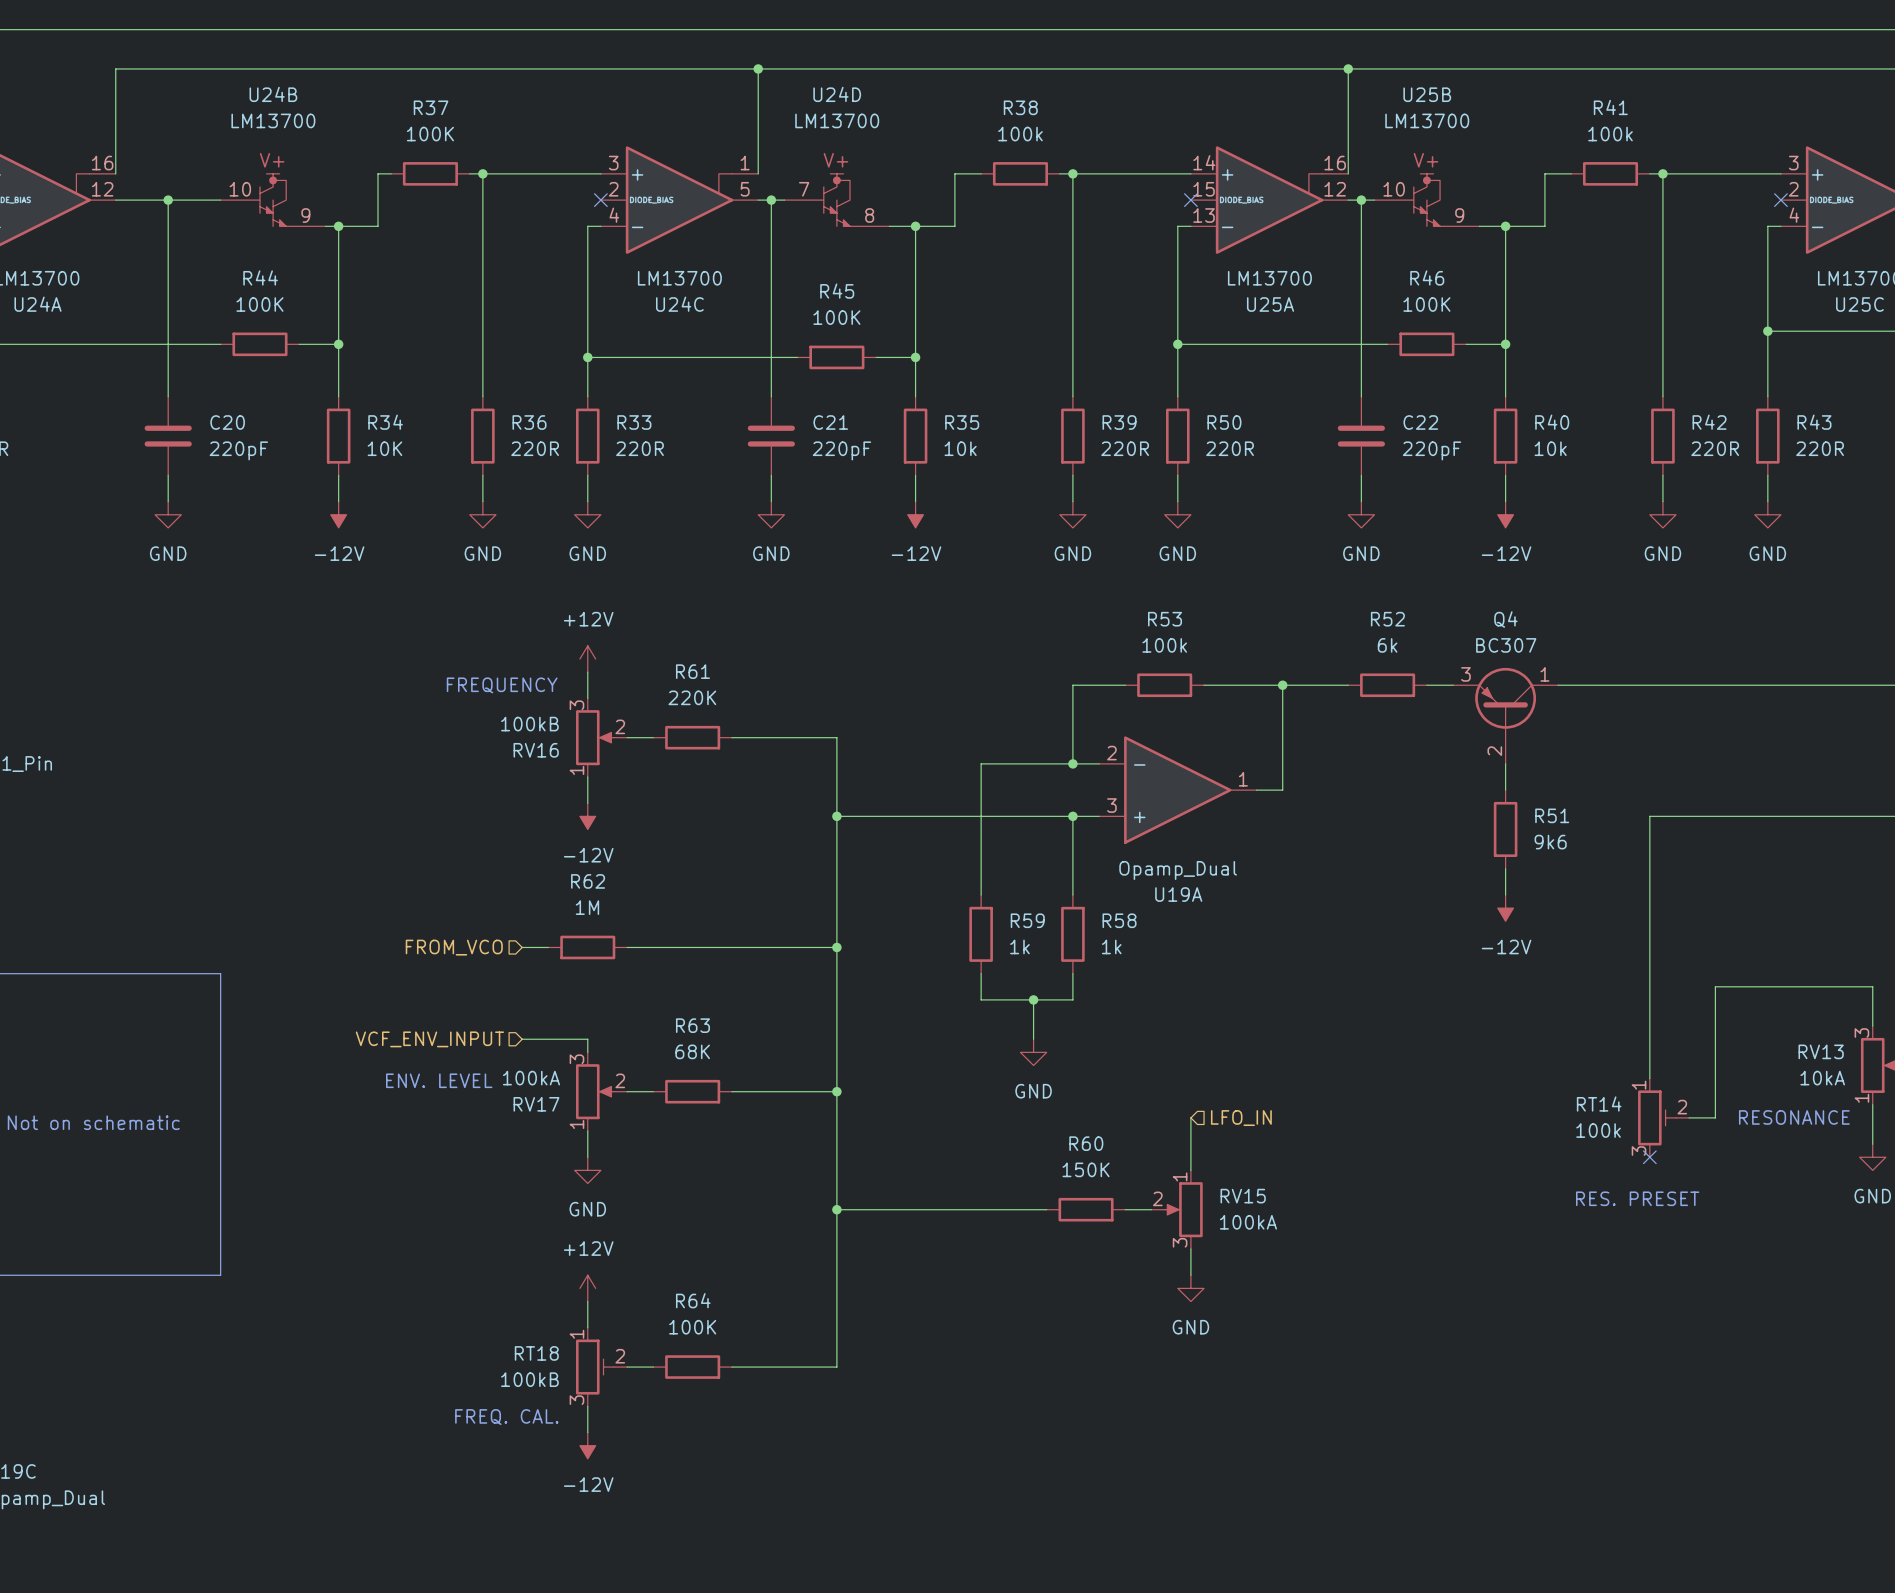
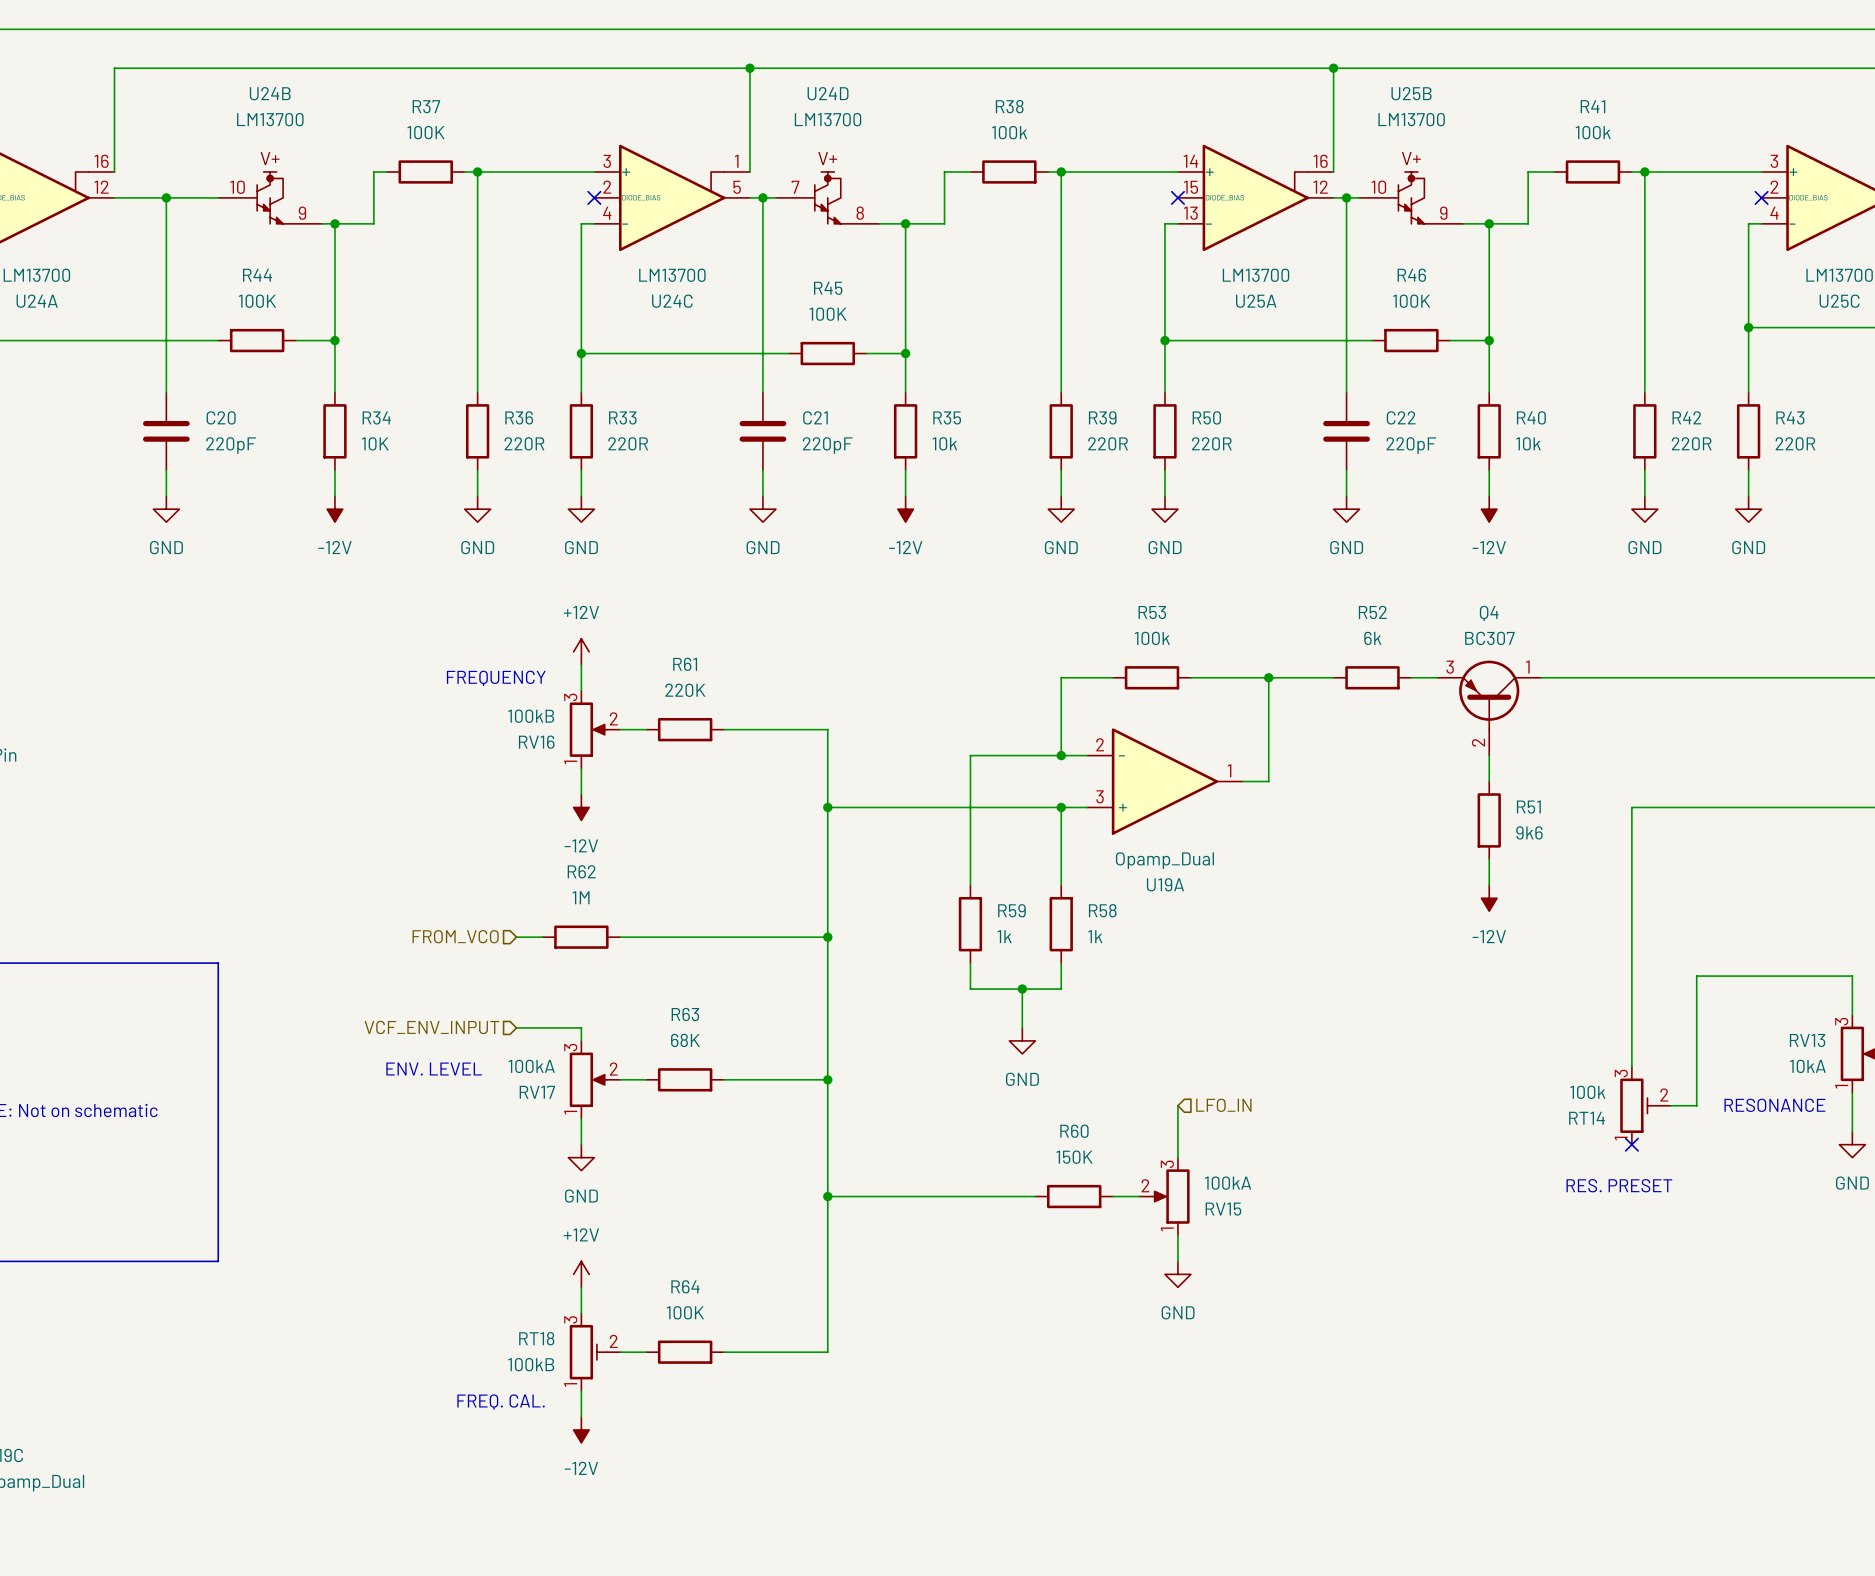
RT14 flip: as is (1657, 1117) -> up-down (1639, 1105)
RV15 flip: as is (1183, 1209) -> up-down (1170, 1196)
RT18 flip: as is (594, 1367) -> up-down (588, 1352)

